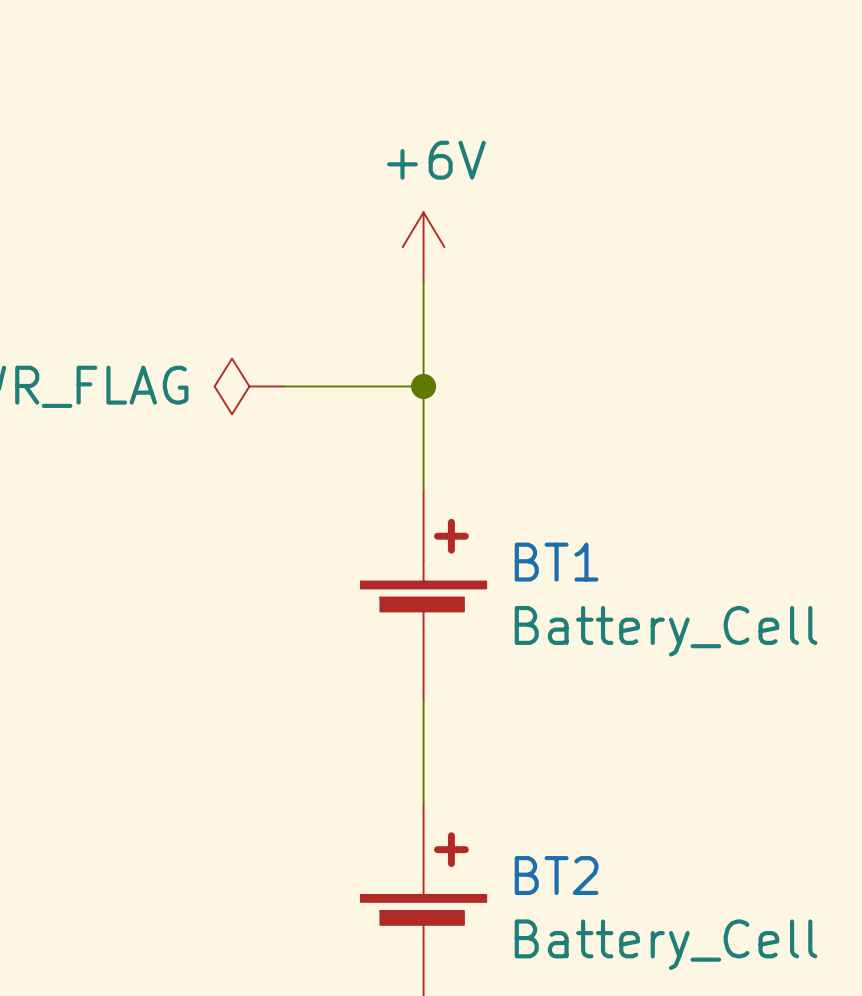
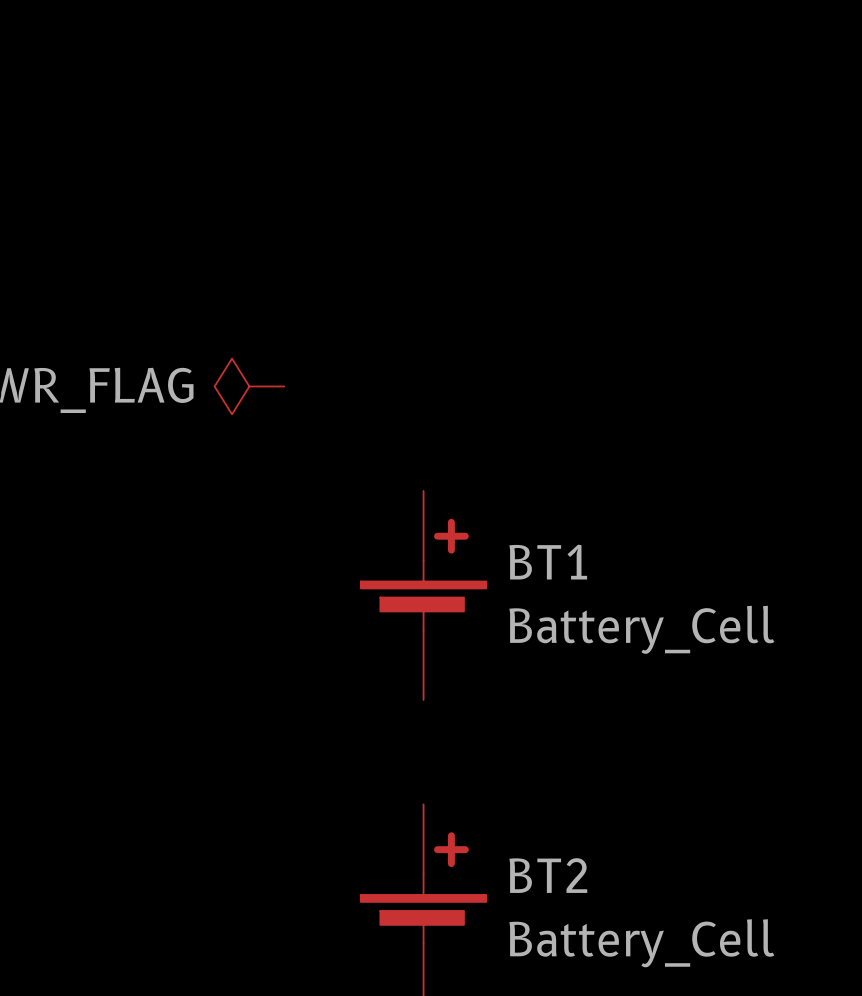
power symbol: +6V (423, 247) -> none
wire: (423, 282) (423, 490) -> none
wire: (284, 386) (423, 386) -> none
junction: (423, 386) -> none
wire: (423, 699) (423, 804) -> none

